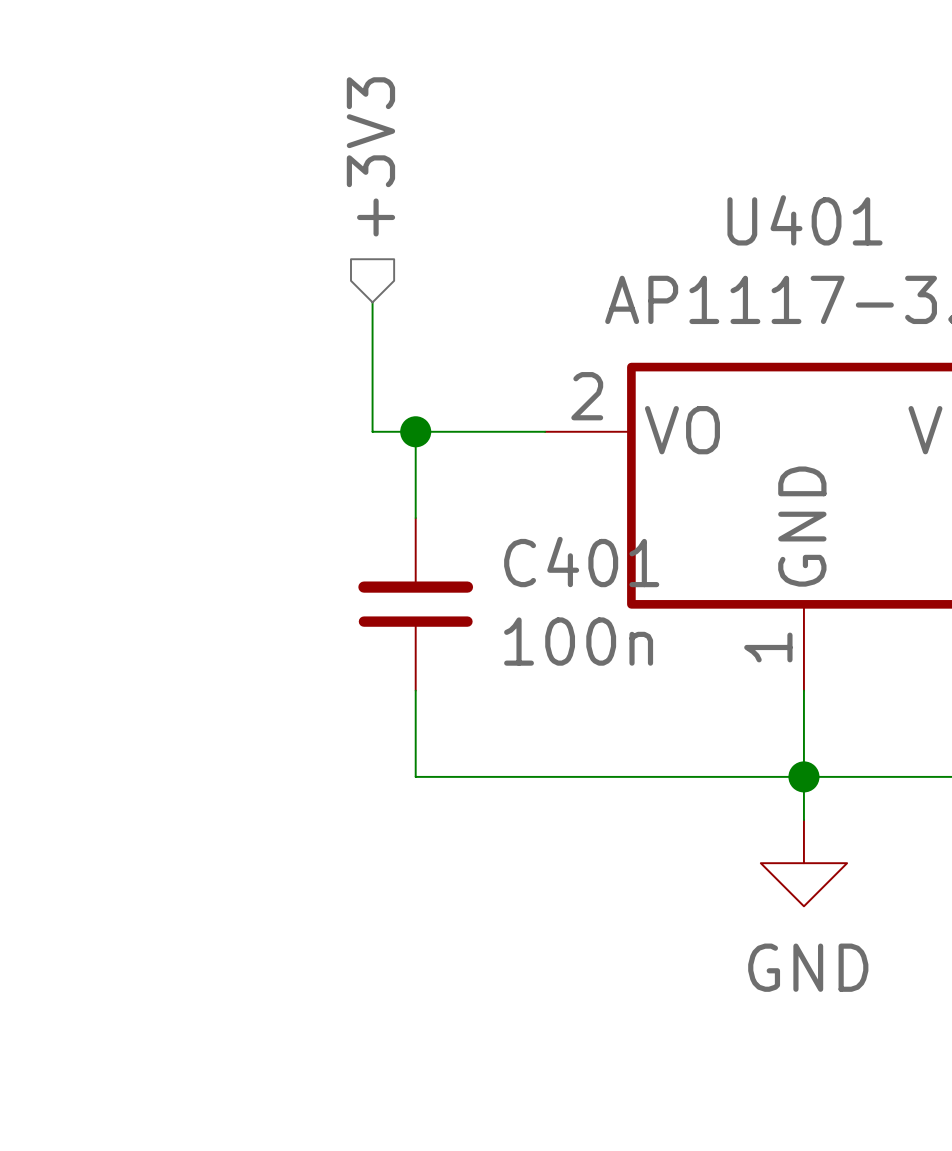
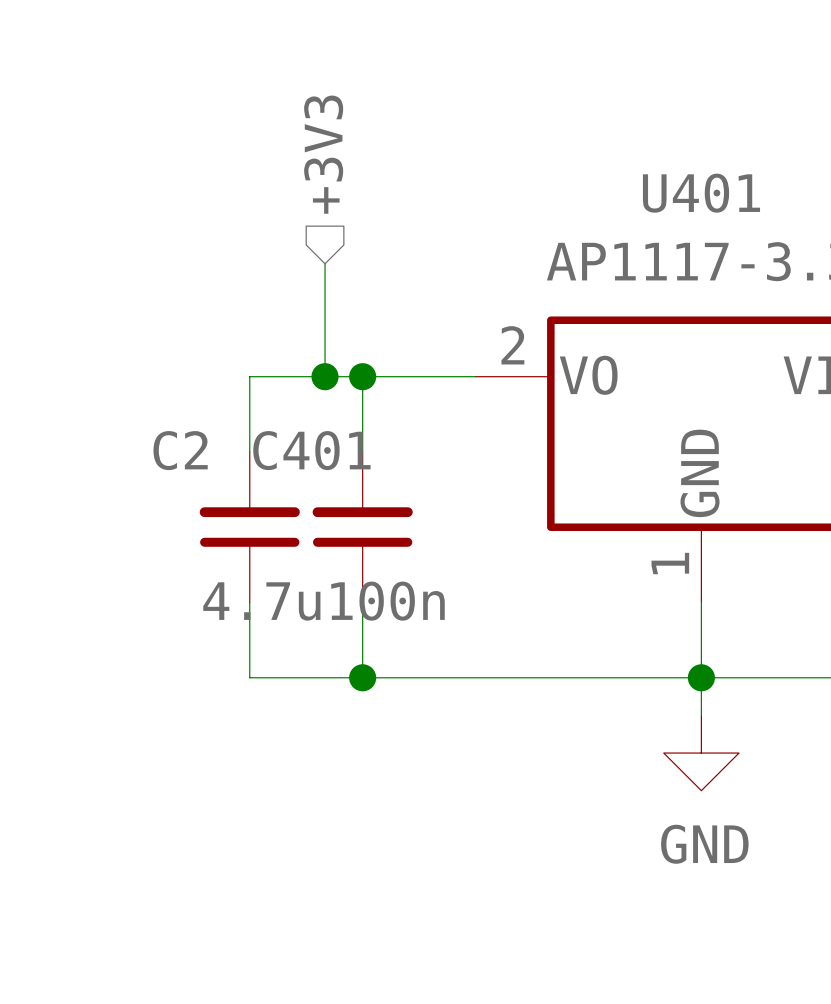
wire: none -> (325, 376) (249, 376) (249, 451)
junction: none -> (325, 376)
C401 name position: C401 (581, 562) -> C401 (311, 450)
C2: none -> 4.7u (249, 527)
C401 value position: 100n (578, 641) -> 100n (387, 601)
wire: none -> (249, 602) (249, 677) (362, 677)
junction: none -> (362, 677)

